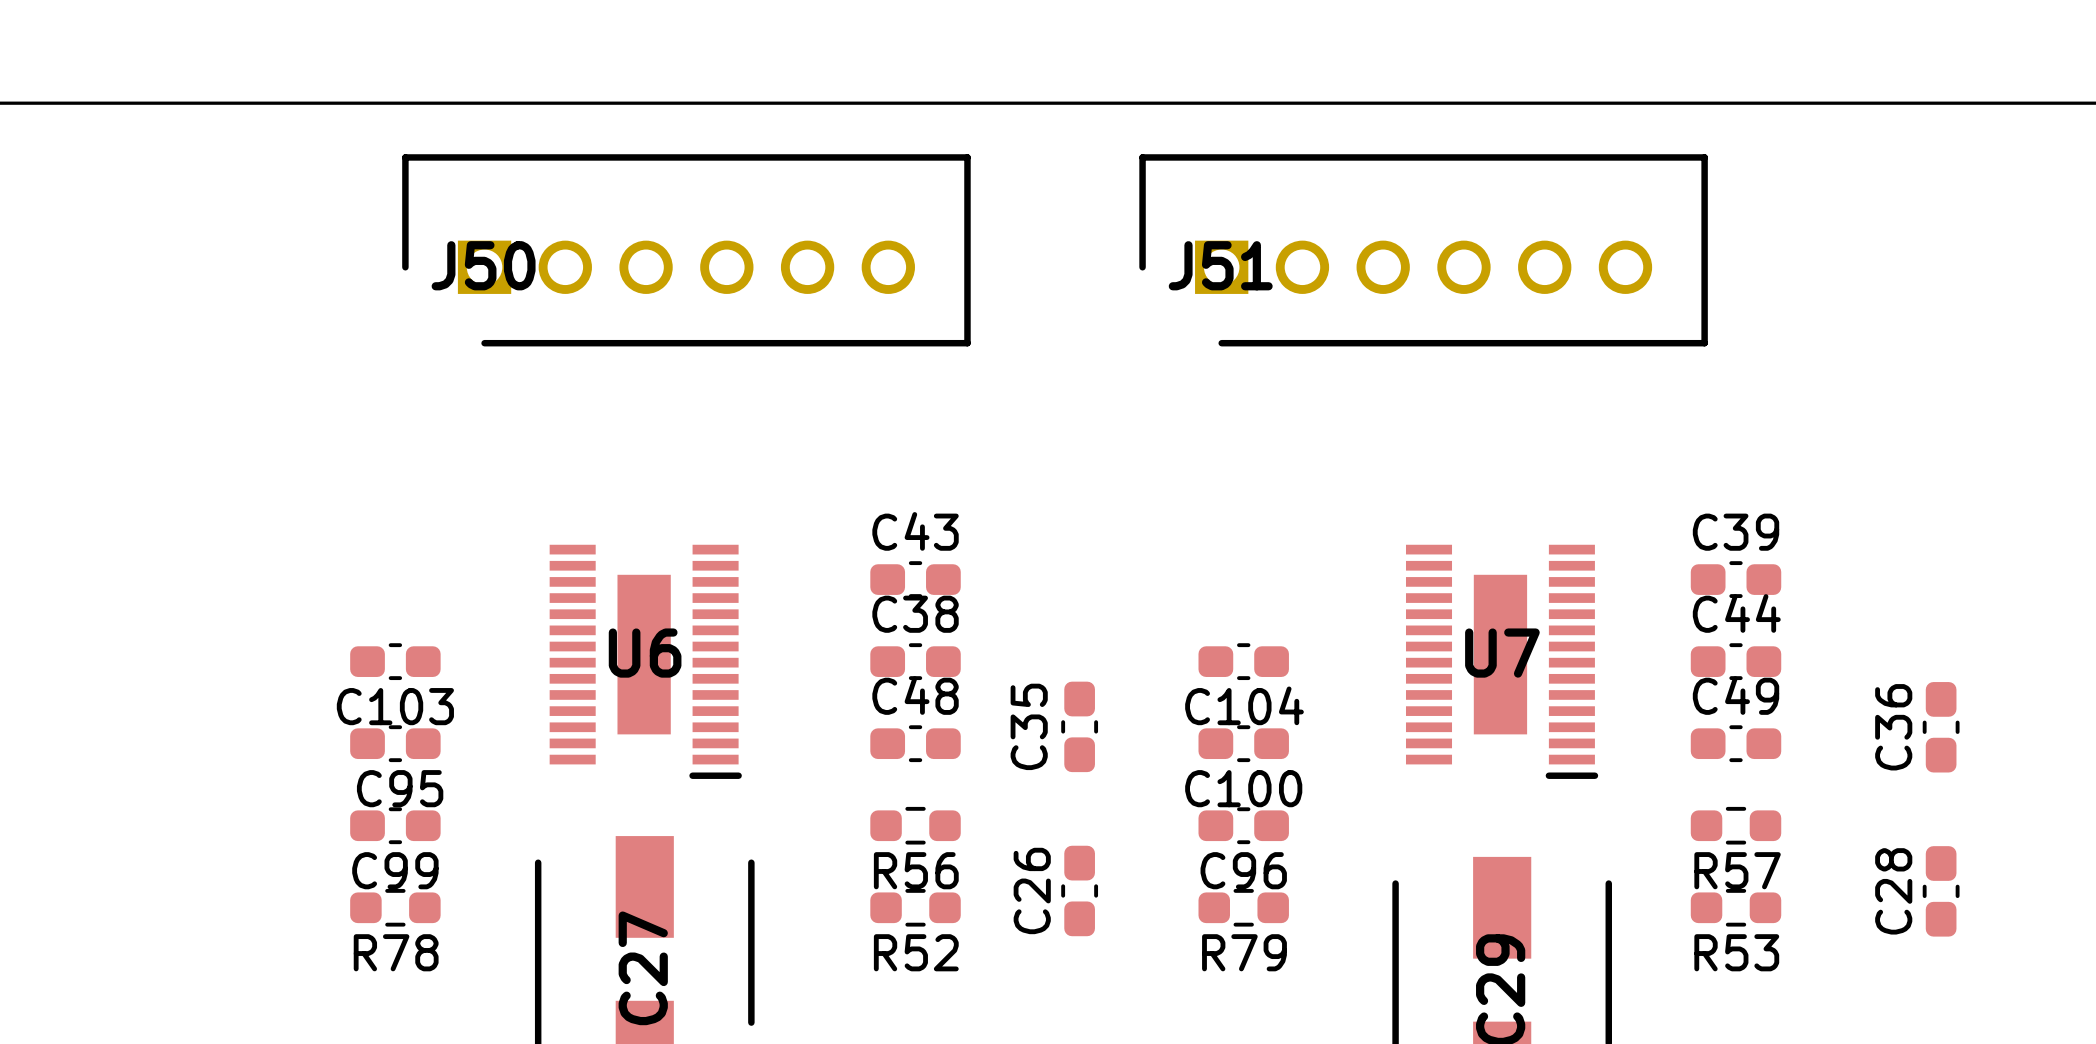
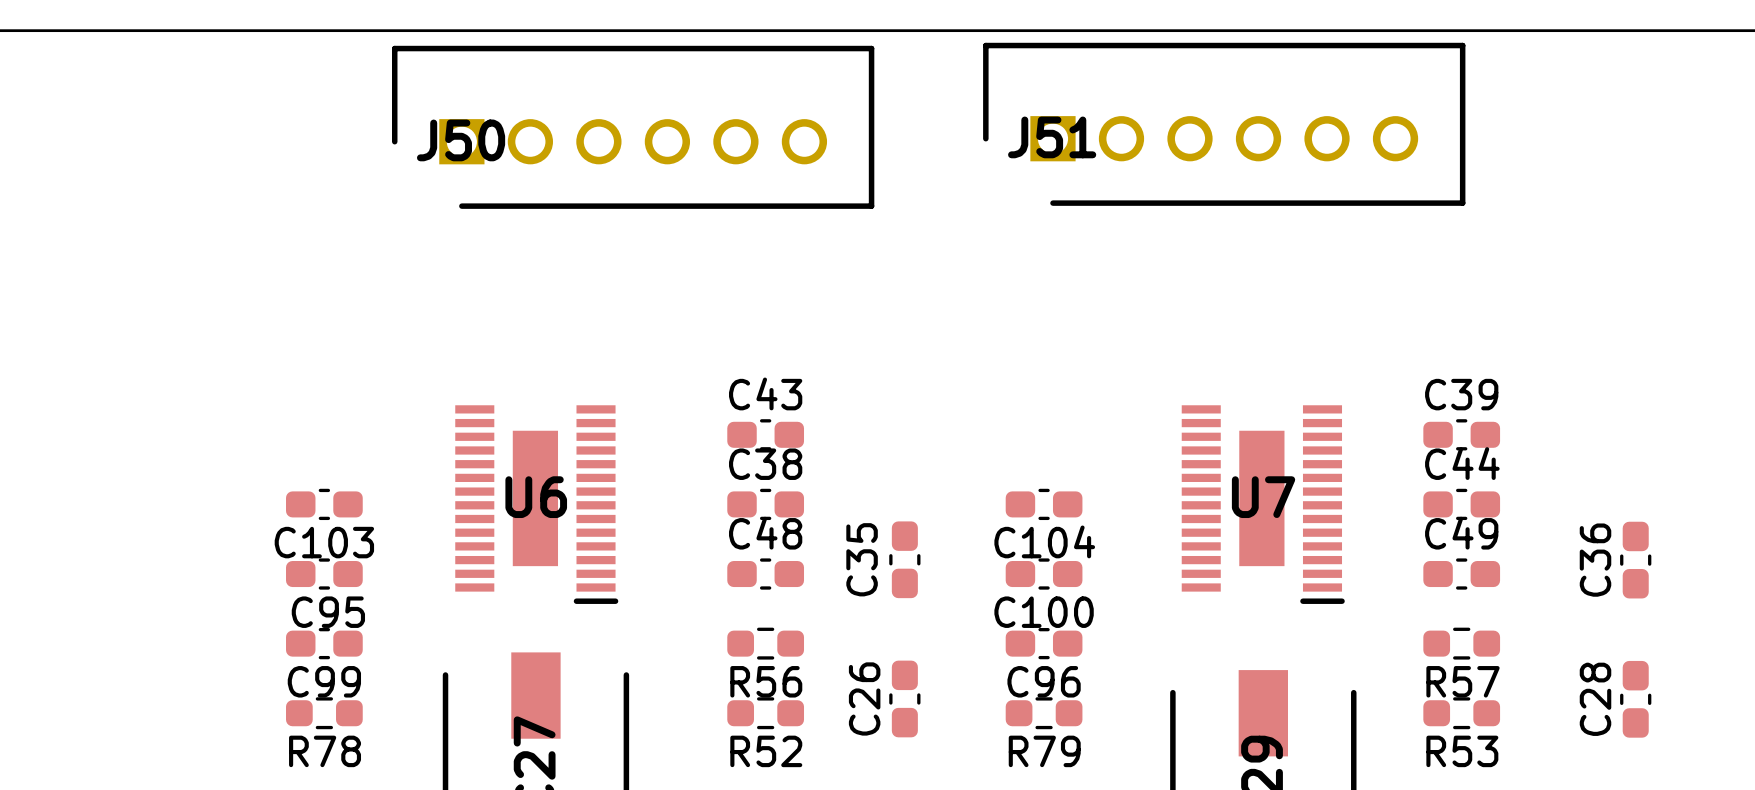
J50 position: (686, 250) -> (633, 127)
J51 position: (1423, 250) -> (1224, 124)

